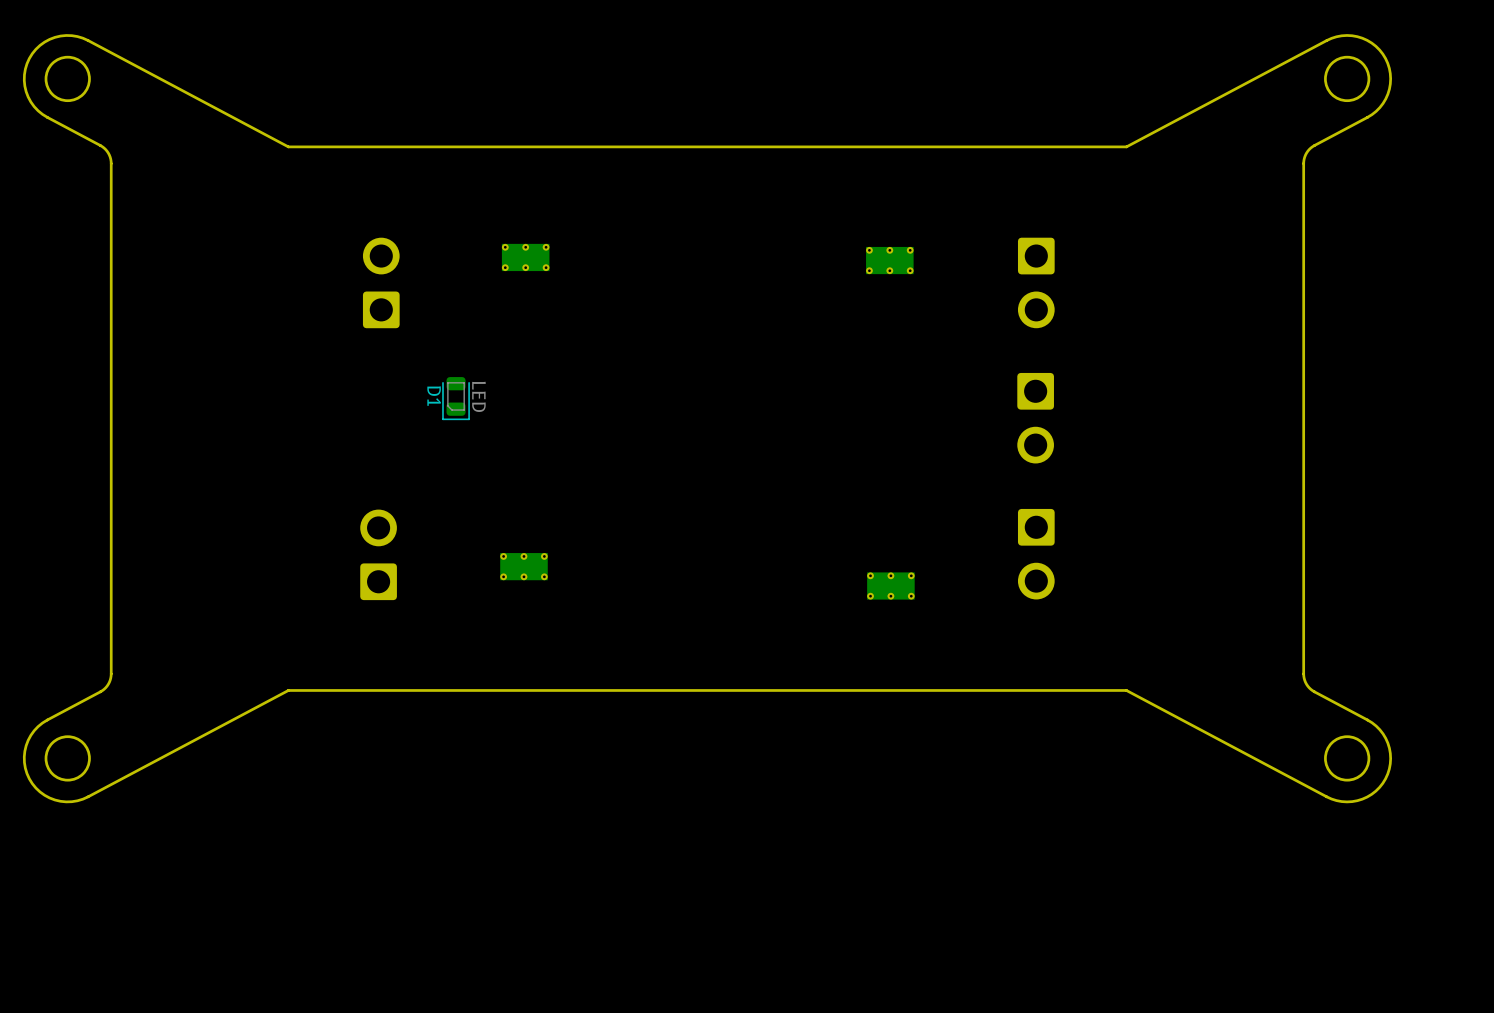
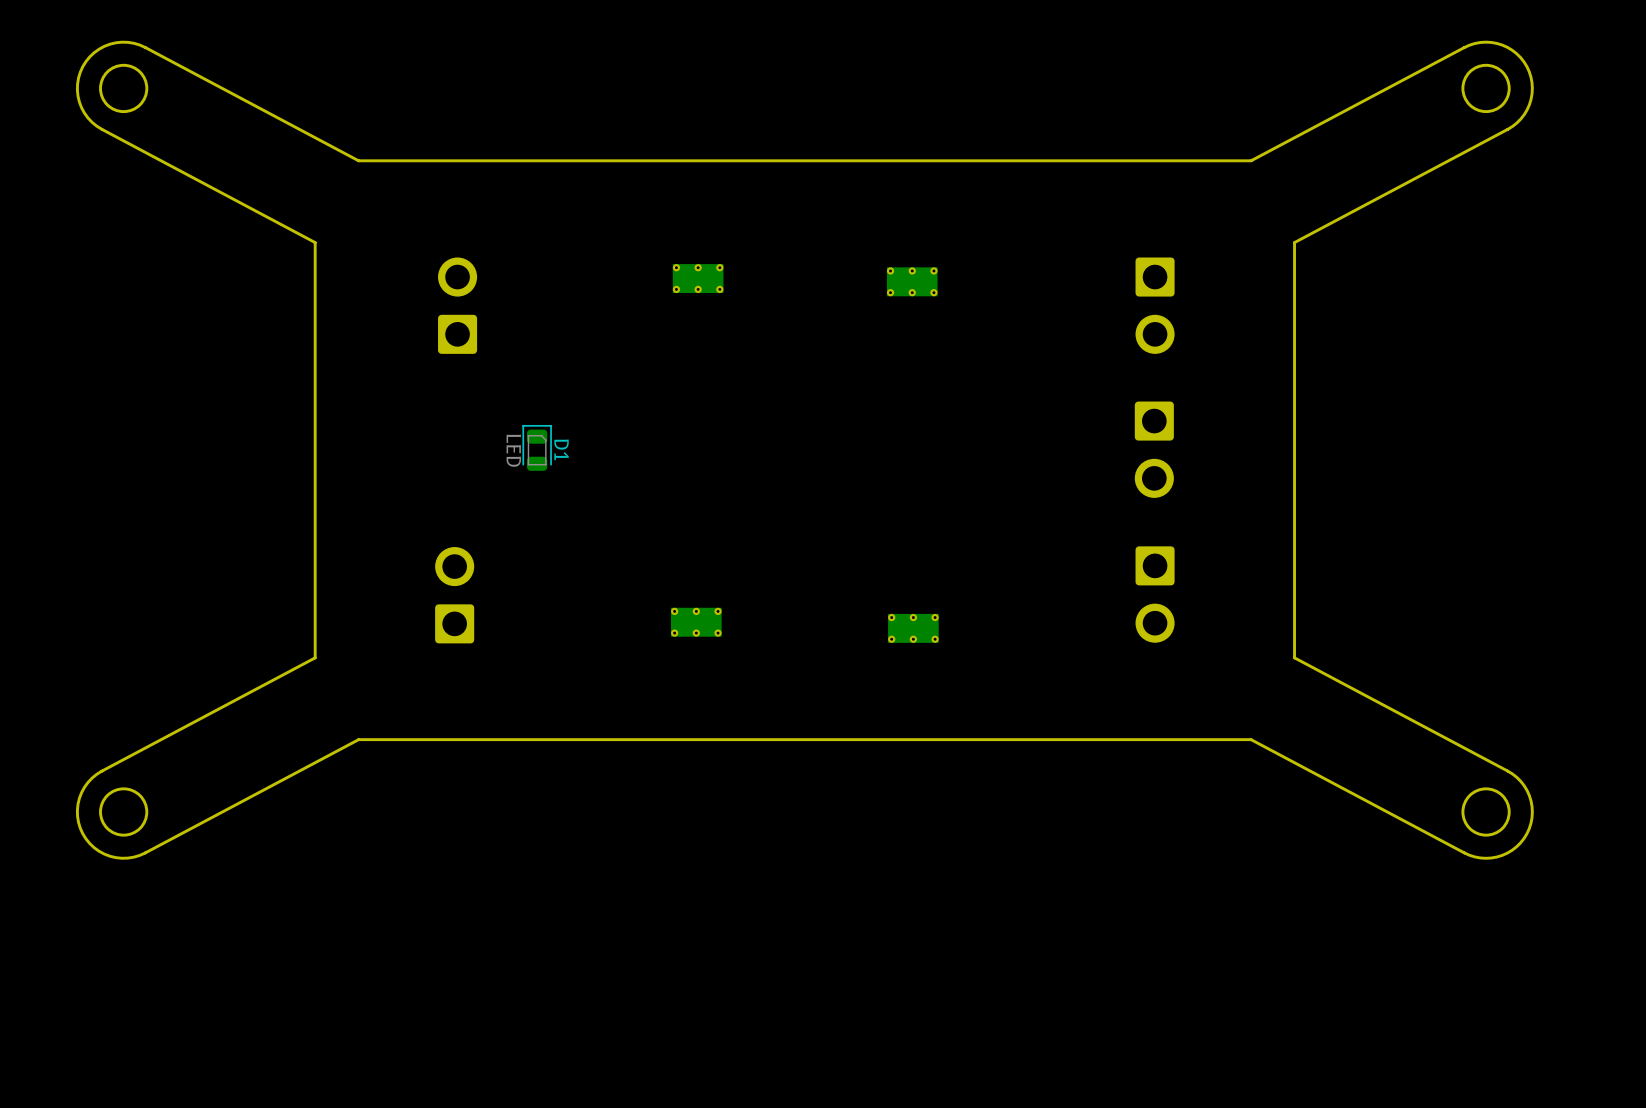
board edge: (100, 145) (108, 153) (111, 163) (111, 673) (108, 684) (100, 691) -> (158, 159) (315, 242) (315, 657) (158, 741)
board edge: (1314, 145) (1306, 153) (1303, 163) (1303, 673) (1306, 684) (1314, 691) -> (1451, 159) (1294, 242) (1294, 657) (1451, 741)
part position: (525, 257) -> (698, 278)
part position: (889, 260) -> (912, 281)
D1 rotation: 0° (456, 398) -> 180° (537, 447)
part position: (523, 566) -> (696, 622)
part position: (890, 586) -> (913, 628)

